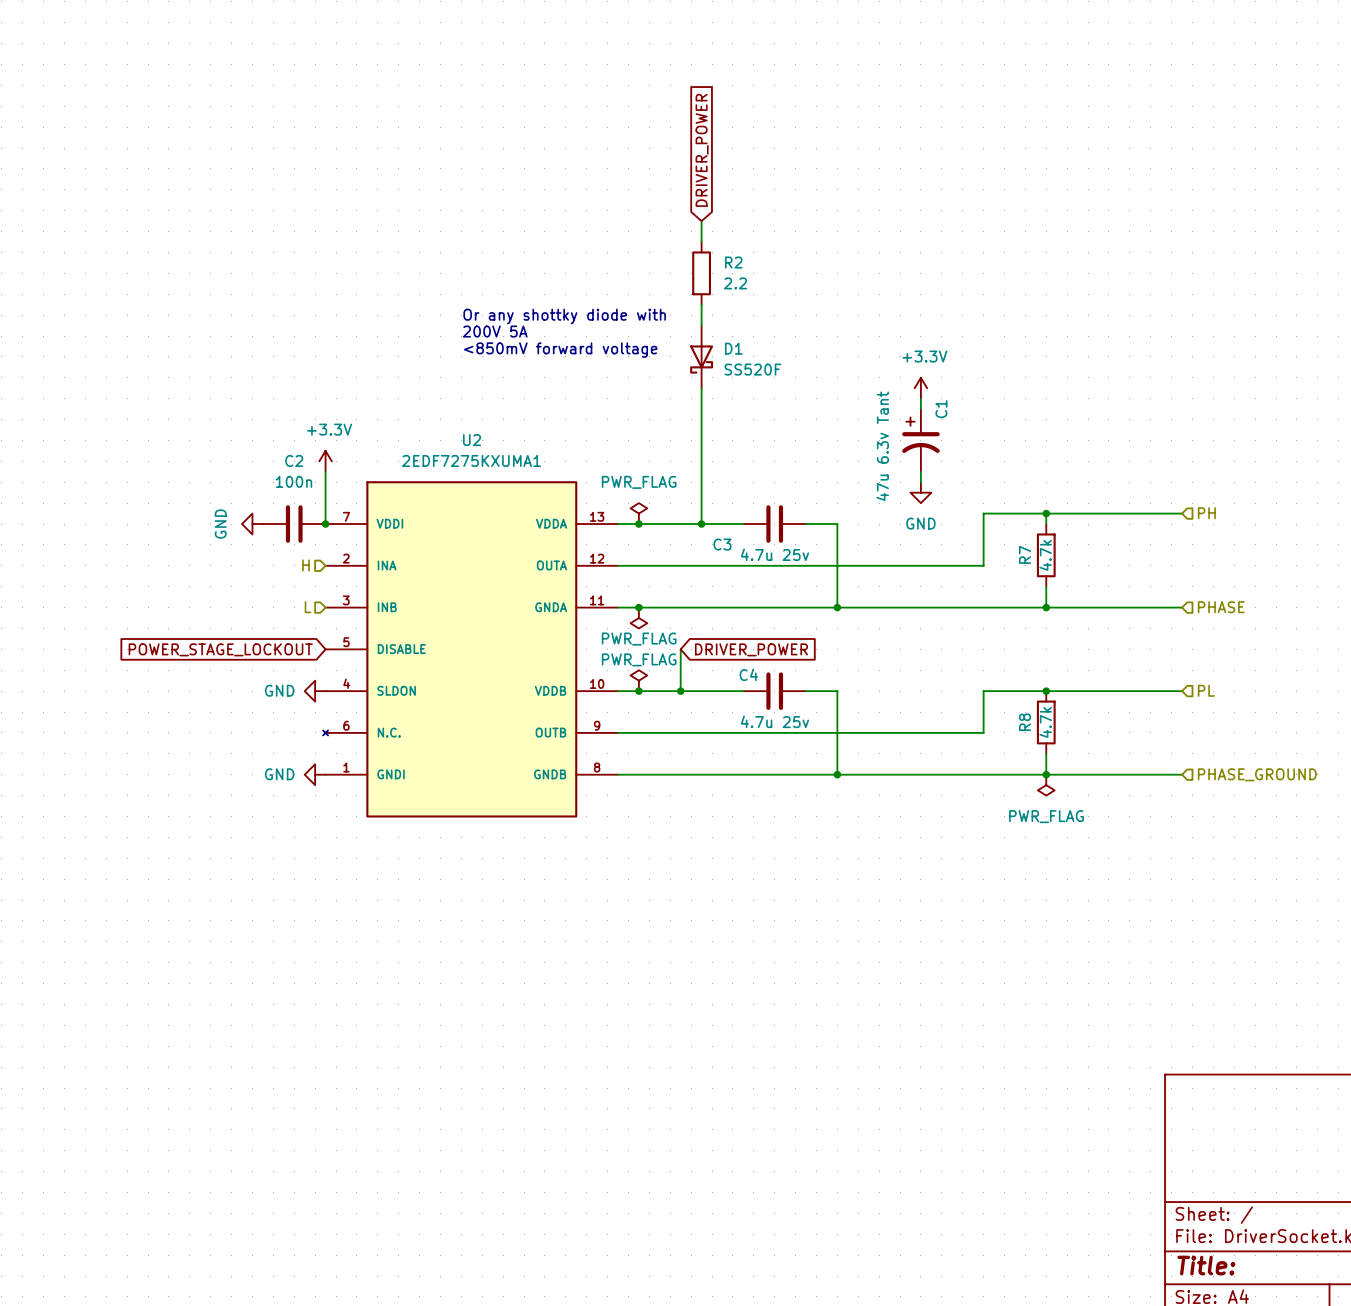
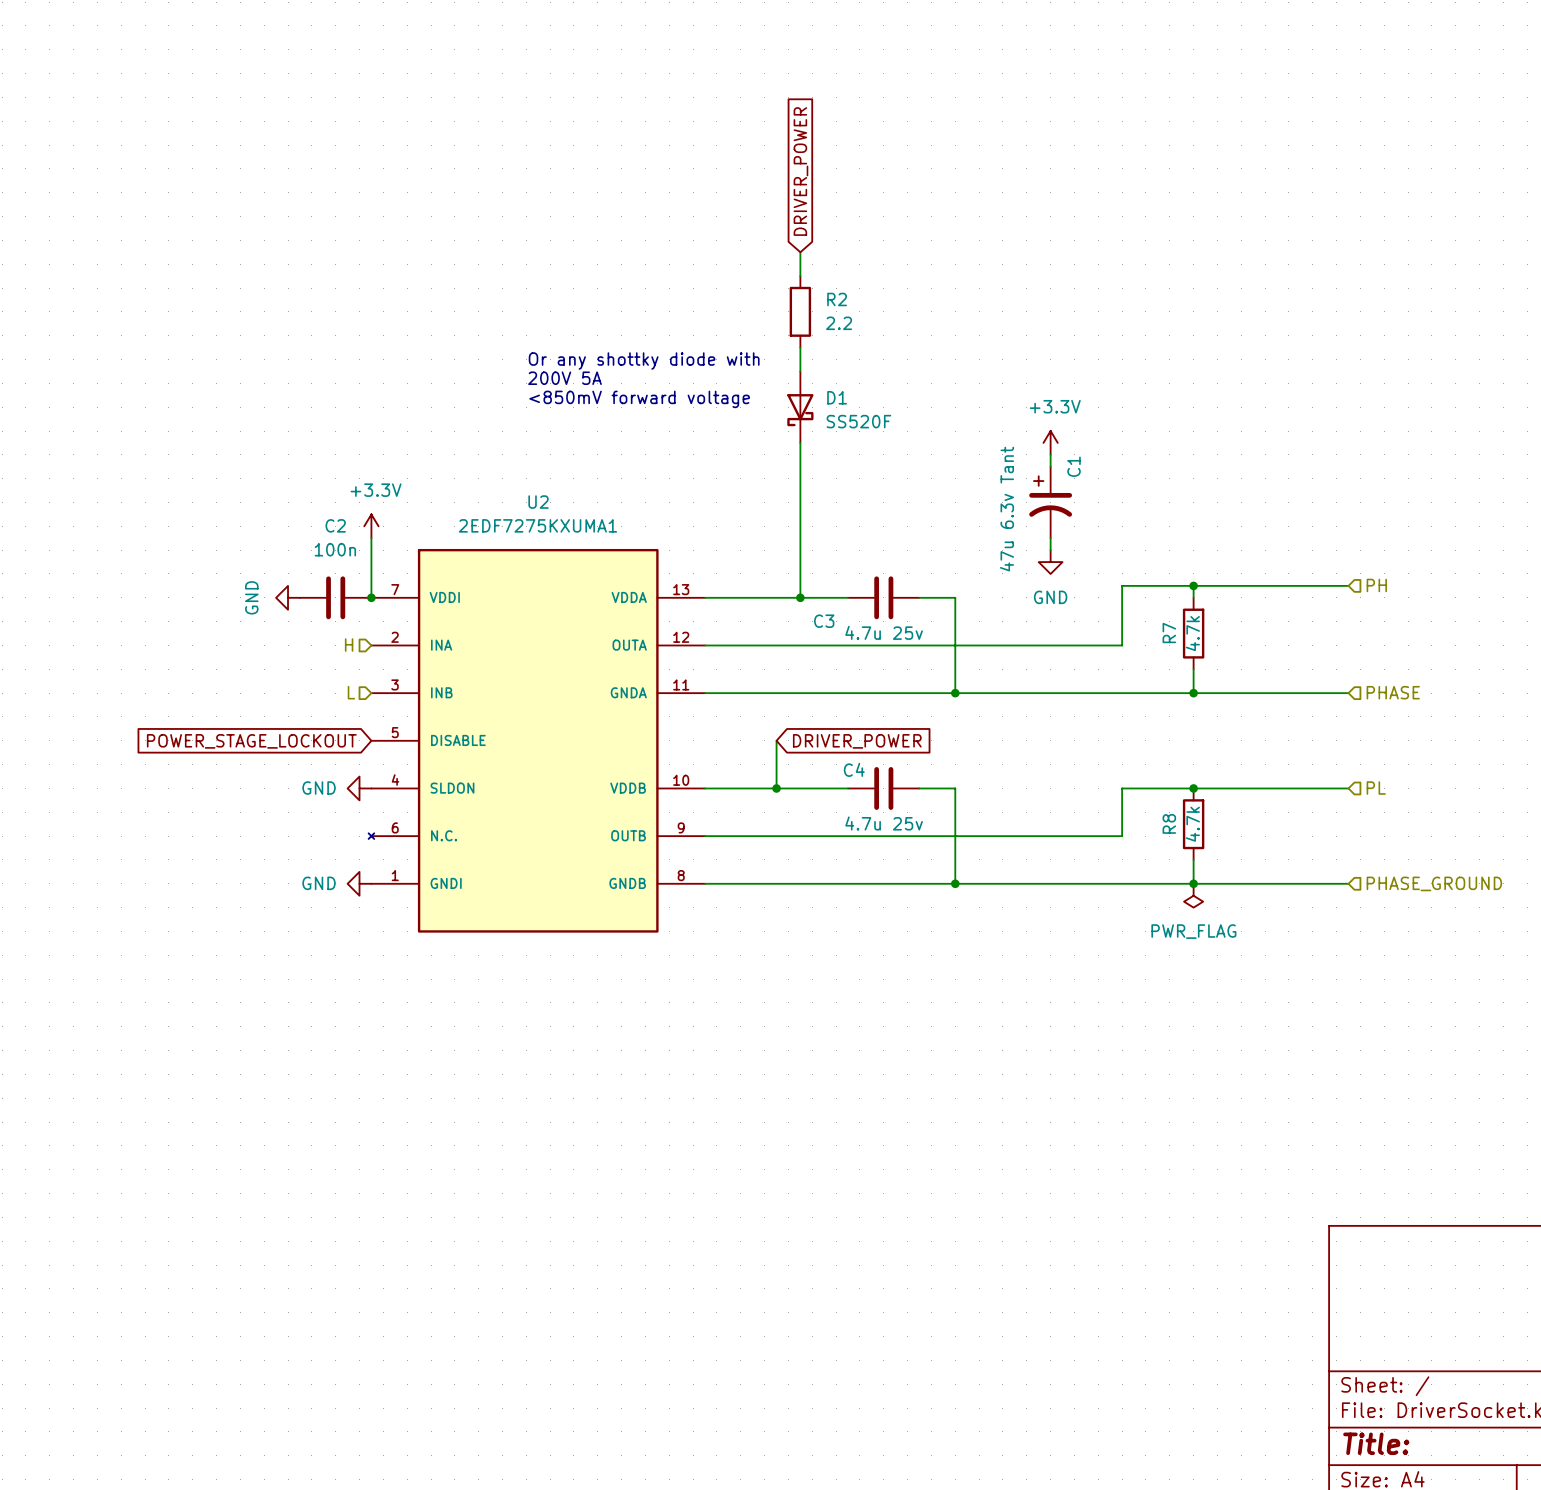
power symbol: PWR_FLAG (638, 513) -> none
junction: (638, 524) -> none
junction: (638, 607) -> none
power symbol: PWR_FLAG (638, 618) -> none
power symbol: PWR_FLAG (638, 680) -> none
junction: (638, 691) -> none

